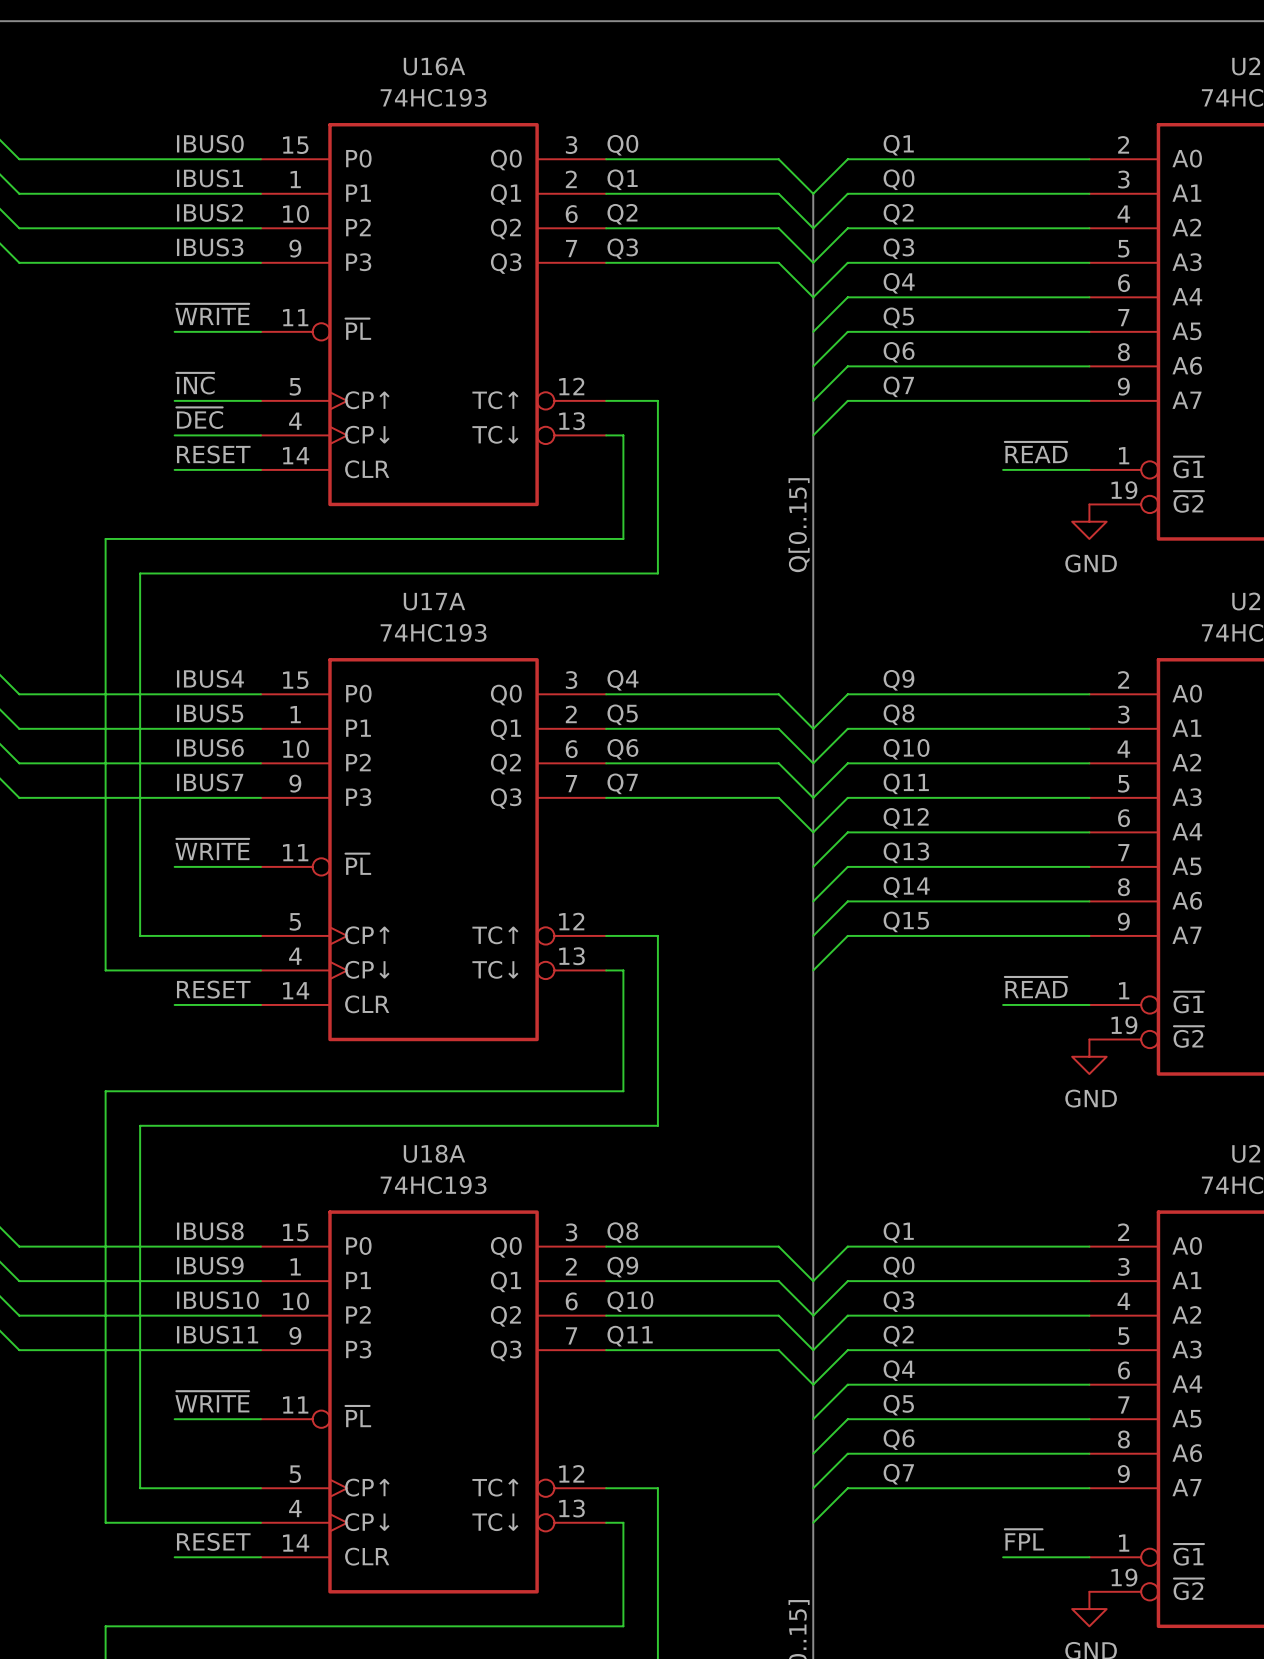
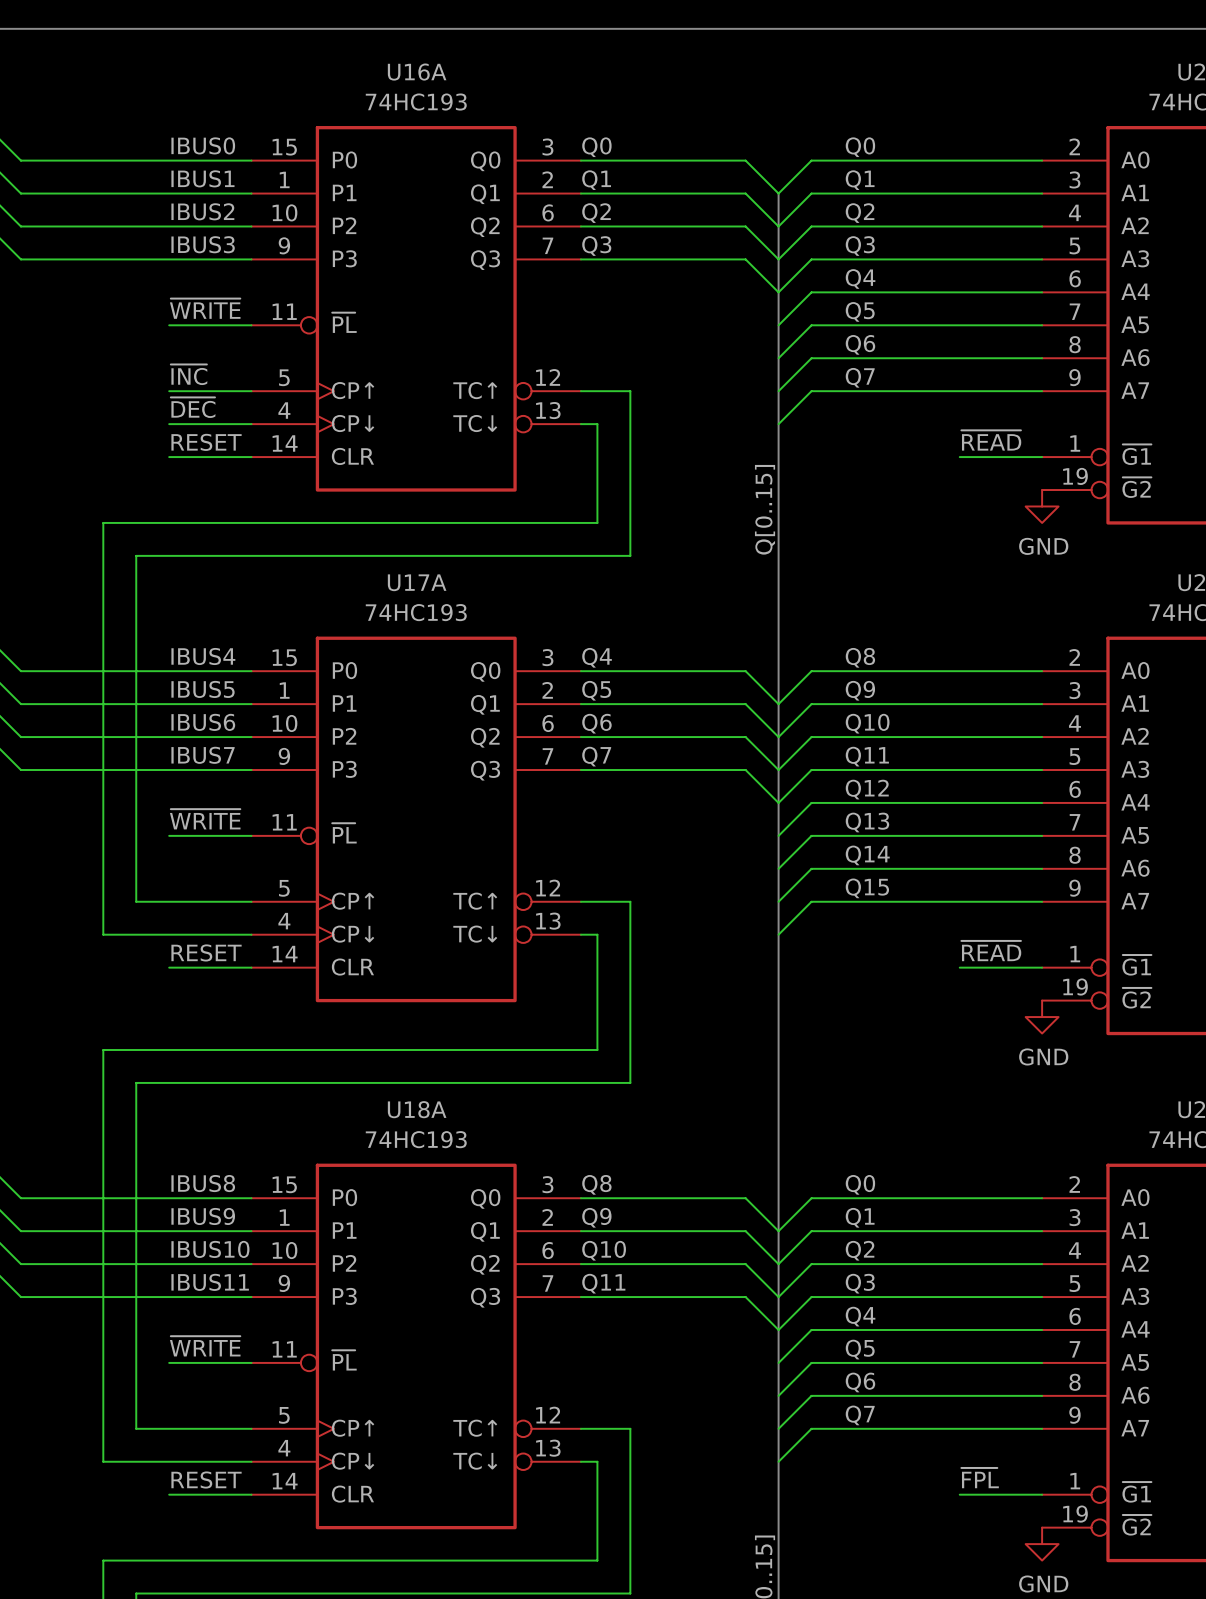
label: Q1 (898, 145) -> Q0 (860, 147)
label: Q0 (899, 179) -> Q1 (860, 180)
label: Q9 (898, 680) -> Q8 (860, 657)
label: Q8 (898, 714) -> Q9 (860, 690)
label: Q1 (898, 1232) -> Q0 (860, 1184)
label: Q0 (899, 1267) -> Q1 (860, 1217)
label: Q3 (898, 1301) -> Q2 (860, 1250)
label: Q2 (898, 1336) -> Q3 (860, 1283)

